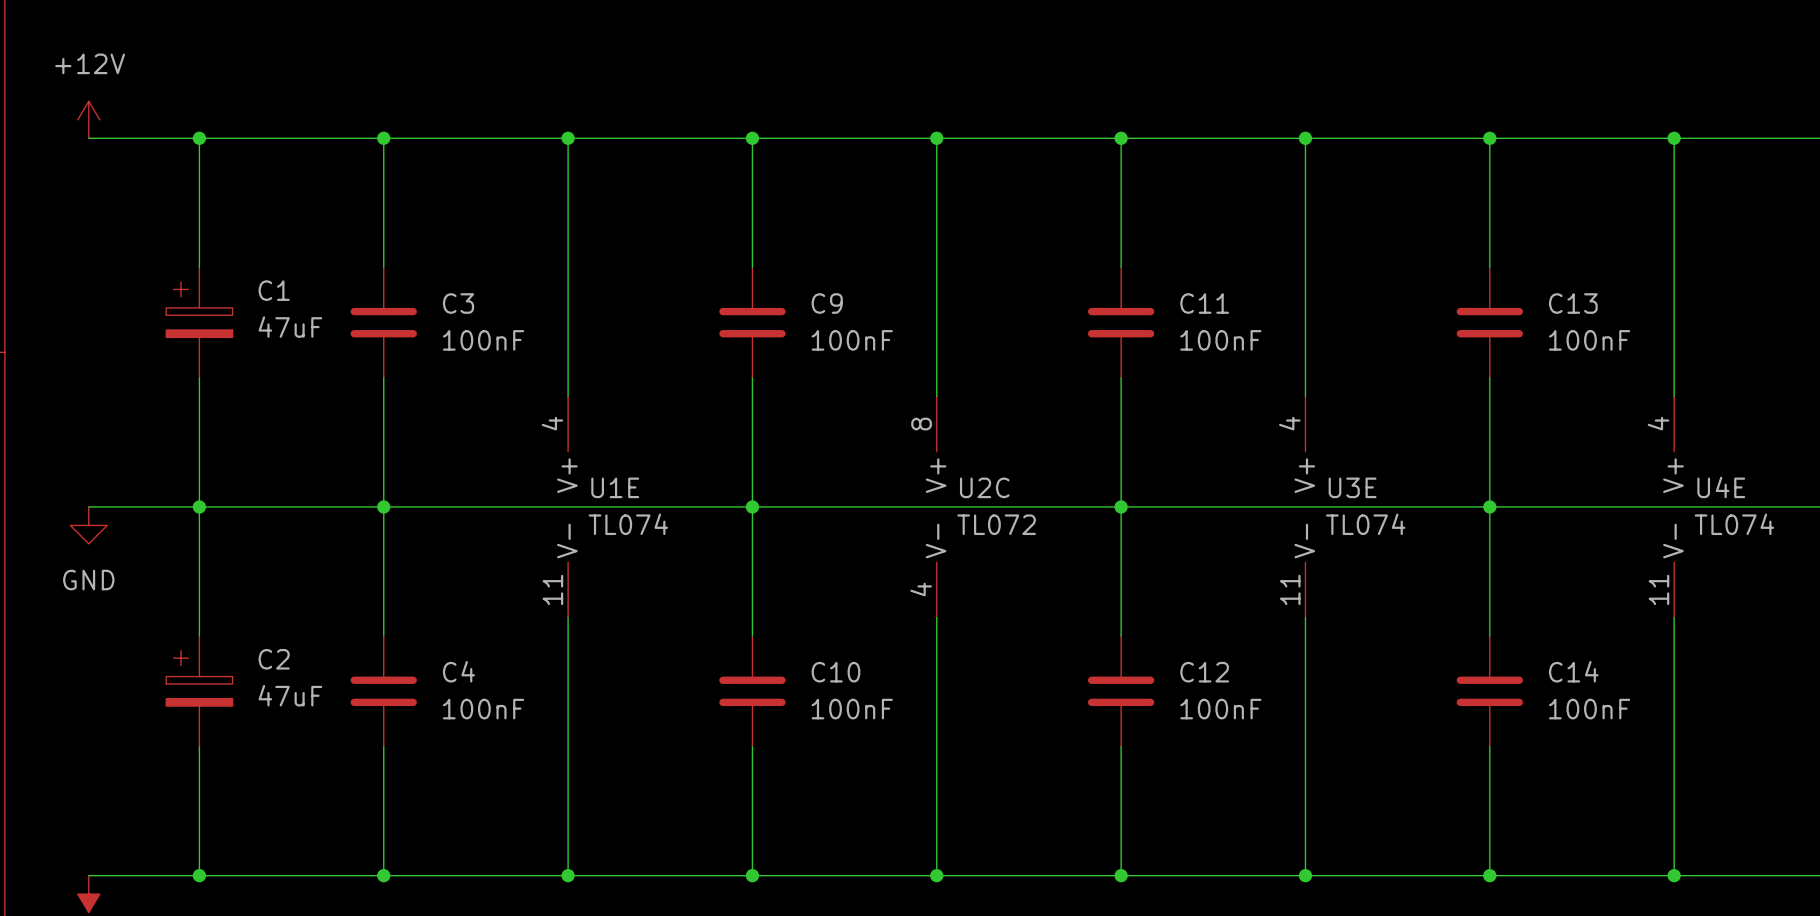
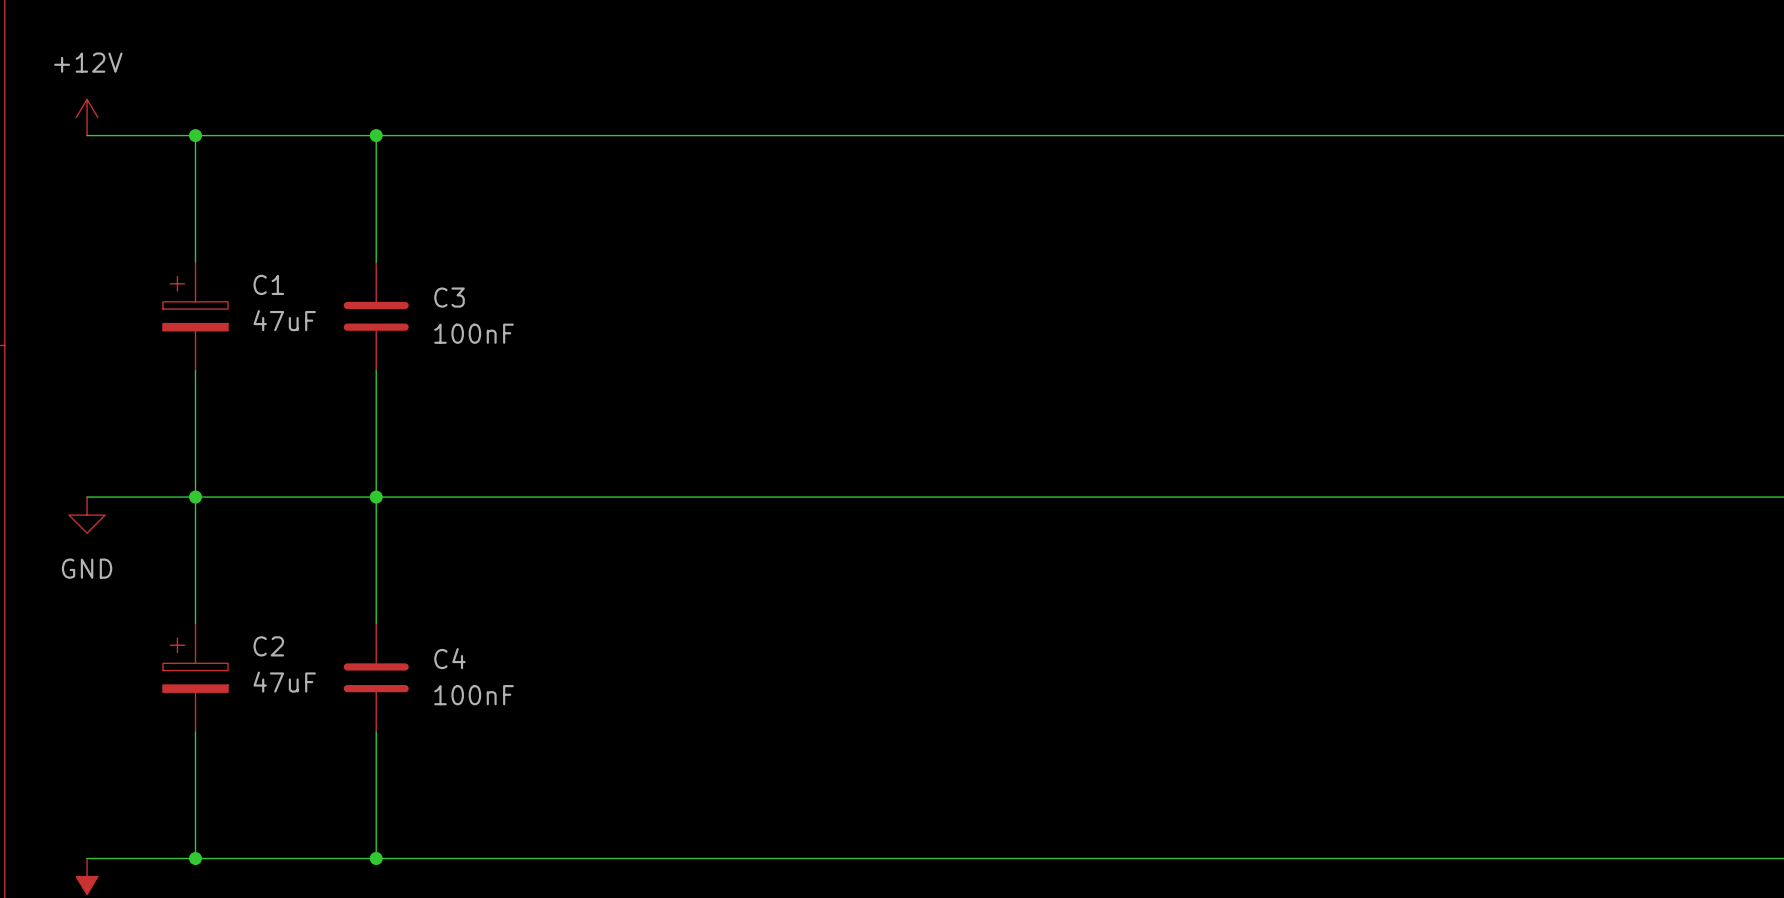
wire: (568, 138) (568, 396) -> none
junction: (568, 138) -> none
wire: (752, 138) (752, 267) -> none
junction: (752, 138) -> none
wire: (936, 138) (936, 396) -> none
junction: (936, 138) -> none
wire: (1121, 138) (1121, 267) -> none
junction: (1121, 138) -> none
wire: (1305, 138) (1305, 396) -> none
junction: (1305, 138) -> none
wire: (1489, 138) (1489, 267) -> none
junction: (1489, 138) -> none
wire: (1674, 138) (1674, 396) -> none
junction: (1674, 138) -> none
C9: 100nF (752, 322) -> none
C11: 100nF (1121, 322) -> none
C13: 100nF (1489, 322) -> none
wire: (752, 377) (752, 636) -> none
wire: (1121, 377) (1121, 636) -> none
wire: (1489, 377) (1489, 636) -> none
U1E: TL074 (568, 506) -> none
junction: (752, 506) -> none
U2C: TL072 (936, 506) -> none
junction: (1121, 506) -> none
U3E: TL074 (1305, 506) -> none
junction: (1489, 506) -> none
U4E: TL074 (1674, 506) -> none
wire: (568, 617) (568, 875) -> none
wire: (936, 617) (936, 875) -> none
wire: (1305, 617) (1305, 875) -> none
wire: (1674, 617) (1674, 875) -> none
C10: 100nF (752, 691) -> none
C12: 100nF (1121, 691) -> none
C14: 100nF (1489, 691) -> none
wire: (752, 746) (752, 875) -> none
wire: (1121, 746) (1121, 875) -> none
wire: (1489, 746) (1489, 875) -> none
junction: (568, 875) -> none
junction: (752, 875) -> none
junction: (936, 875) -> none
junction: (1121, 875) -> none
junction: (1305, 875) -> none
junction: (1489, 875) -> none
junction: (1674, 875) -> none

